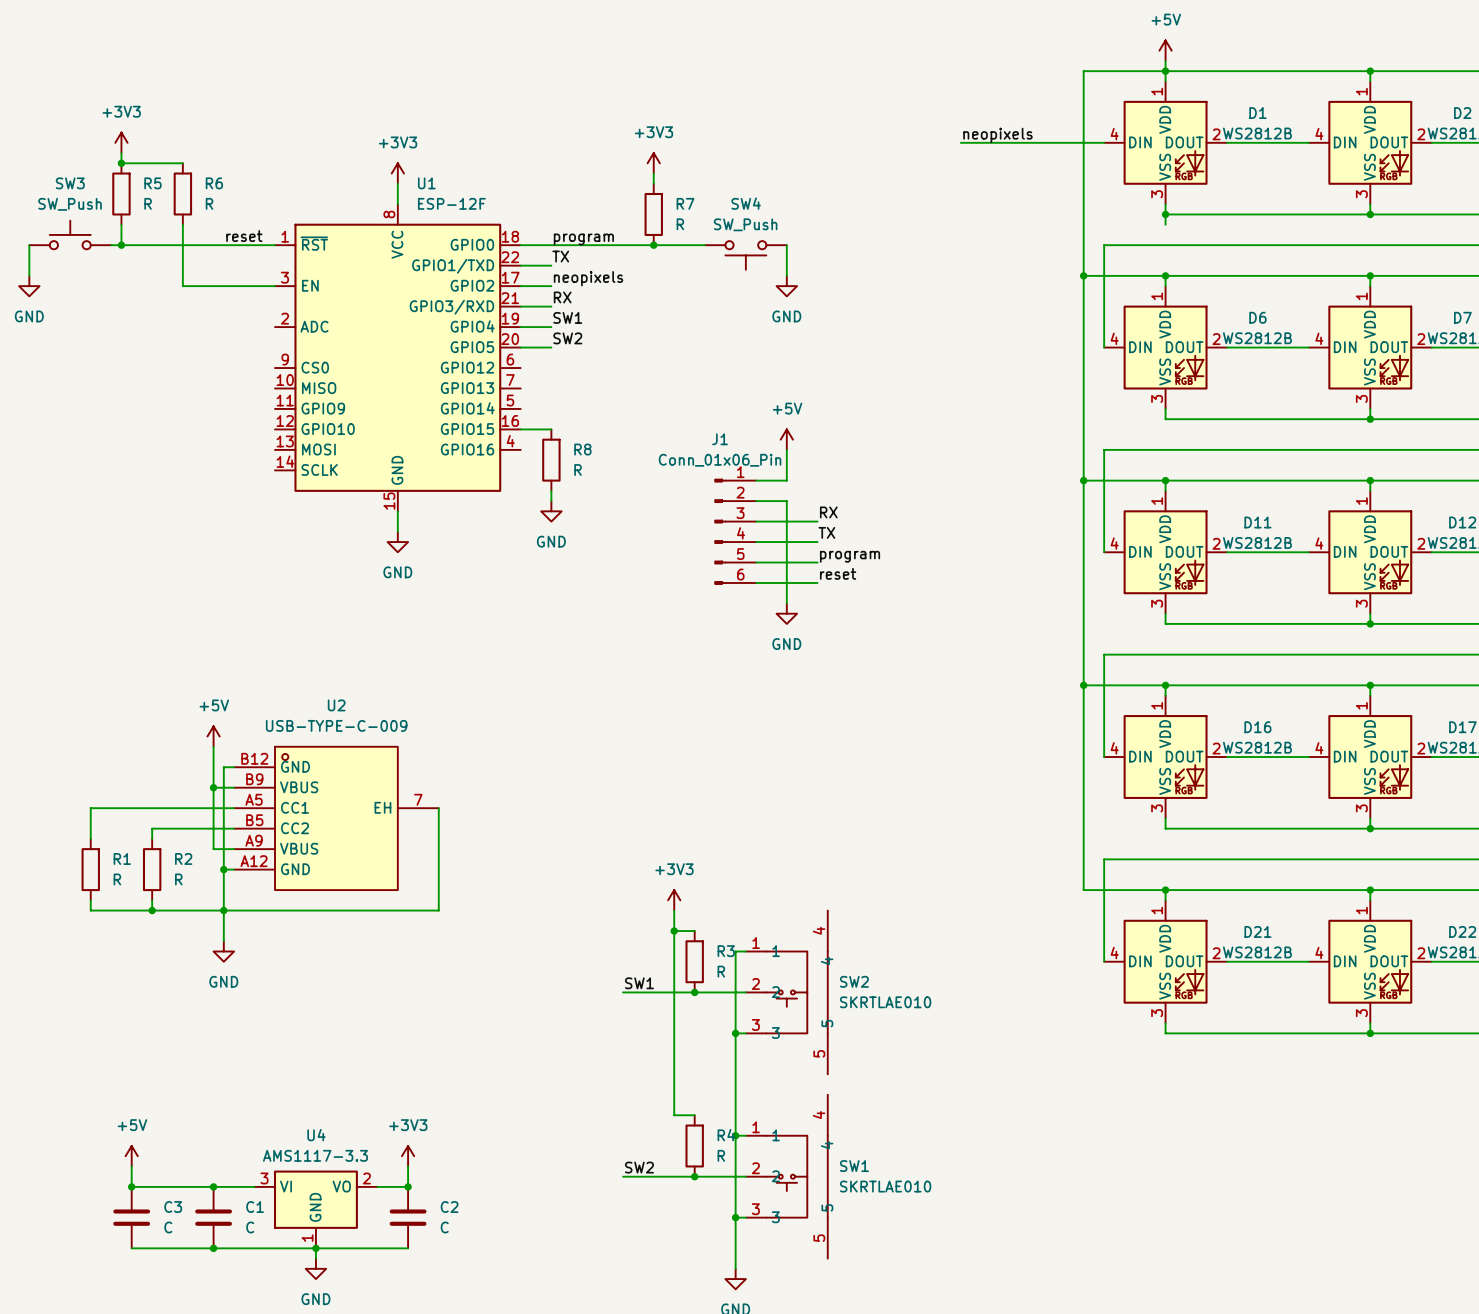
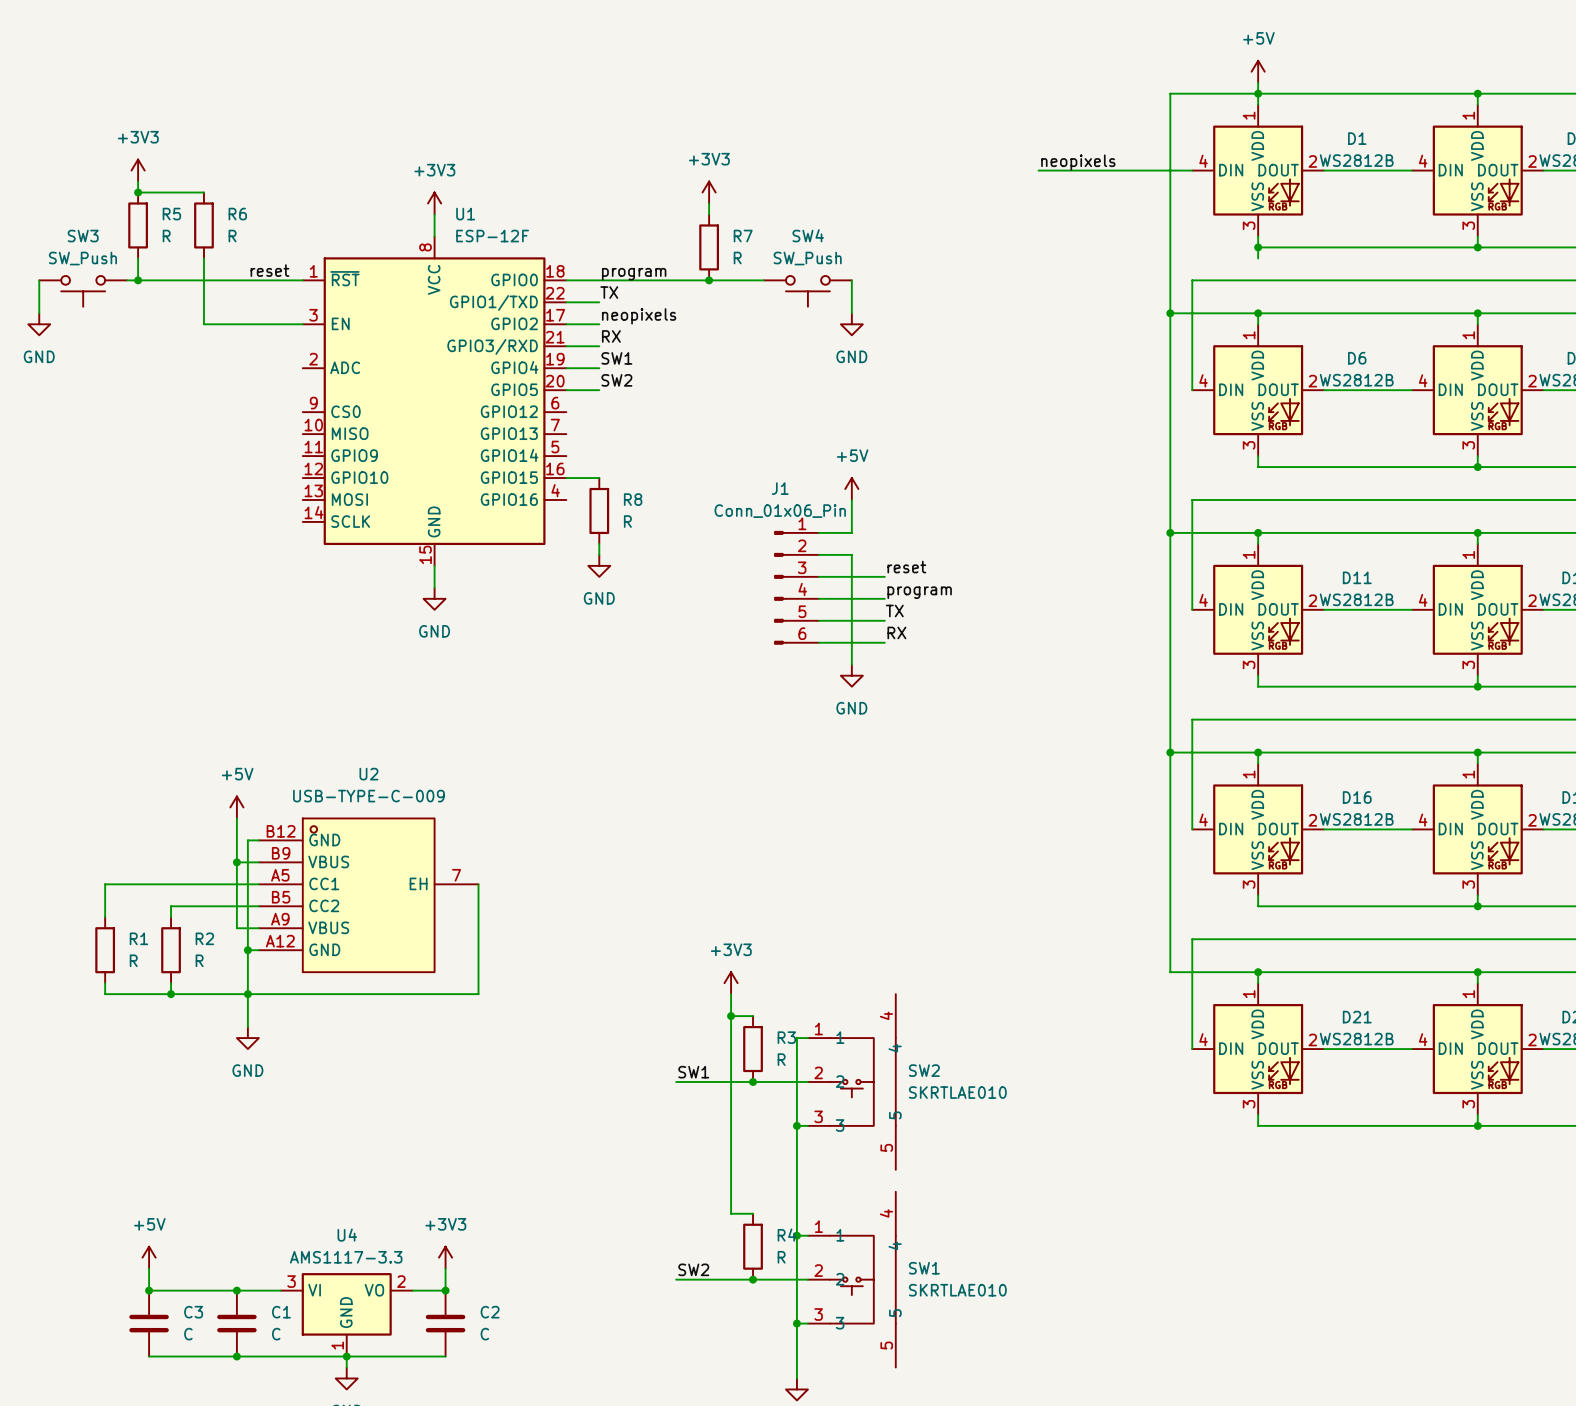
SW3 rotation: 0° (70, 234) -> 180° (83, 291)
label: RX (828, 512) -> reset (906, 567)
label: TX (826, 532) -> program (919, 592)
label: program (850, 556) -> TX (894, 610)
label: reset (838, 573) -> RX (896, 632)

